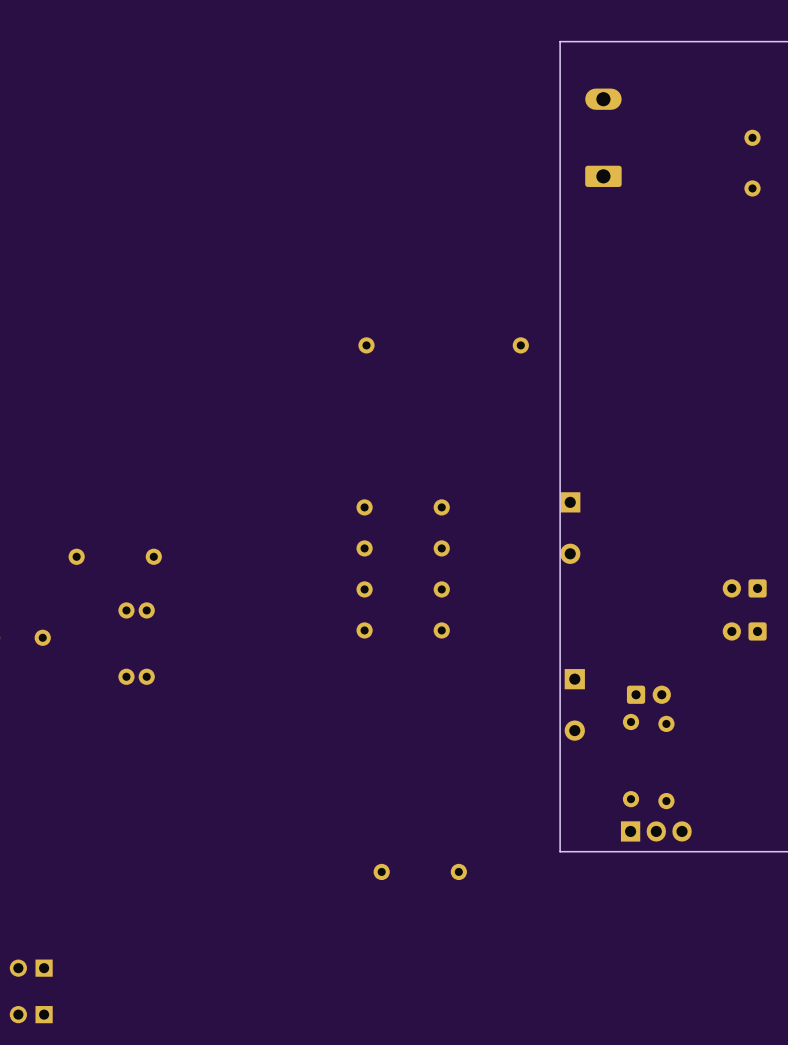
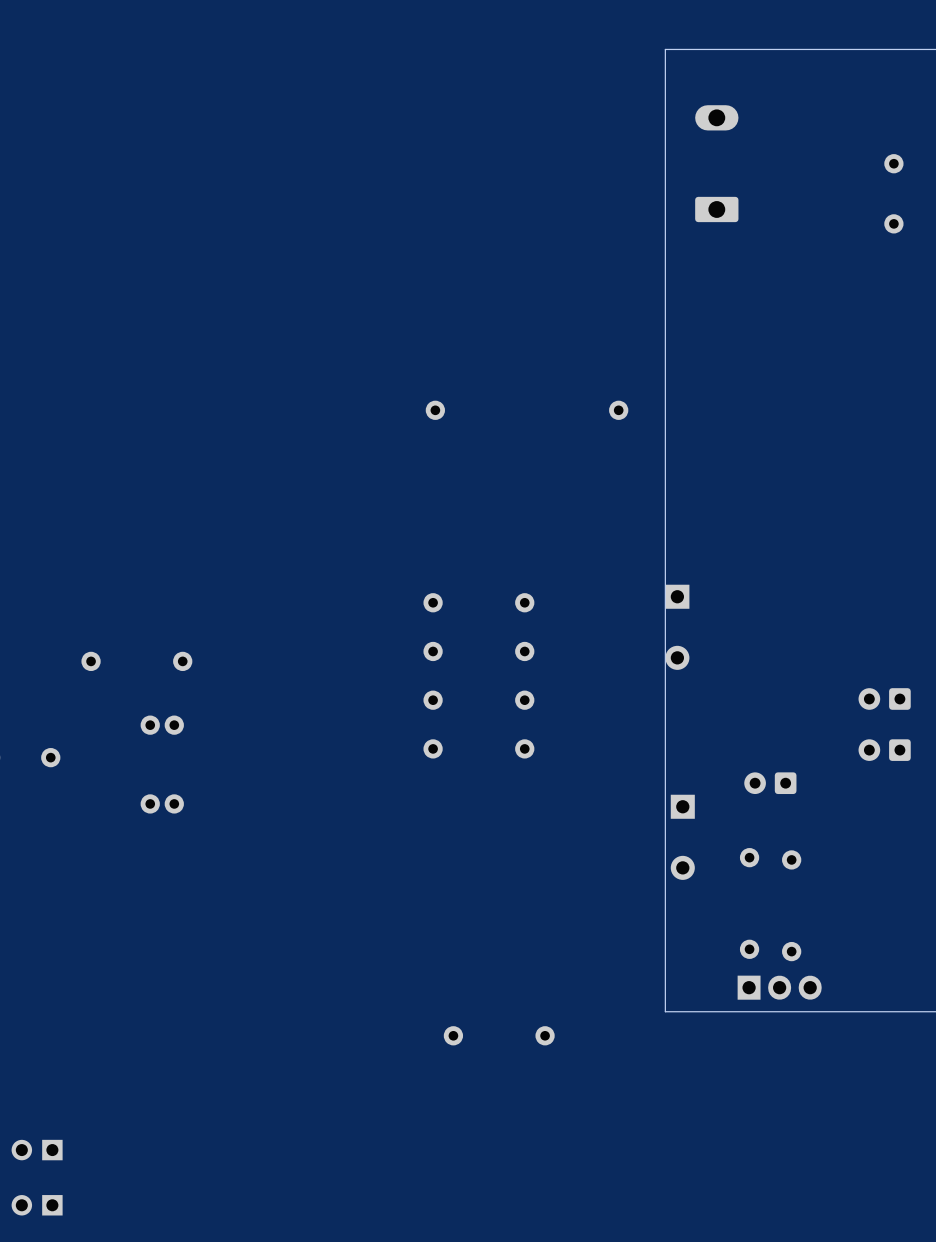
part rotation: 0° (648, 694) -> 180° (770, 783)
part position: (648, 694) -> (770, 783)

